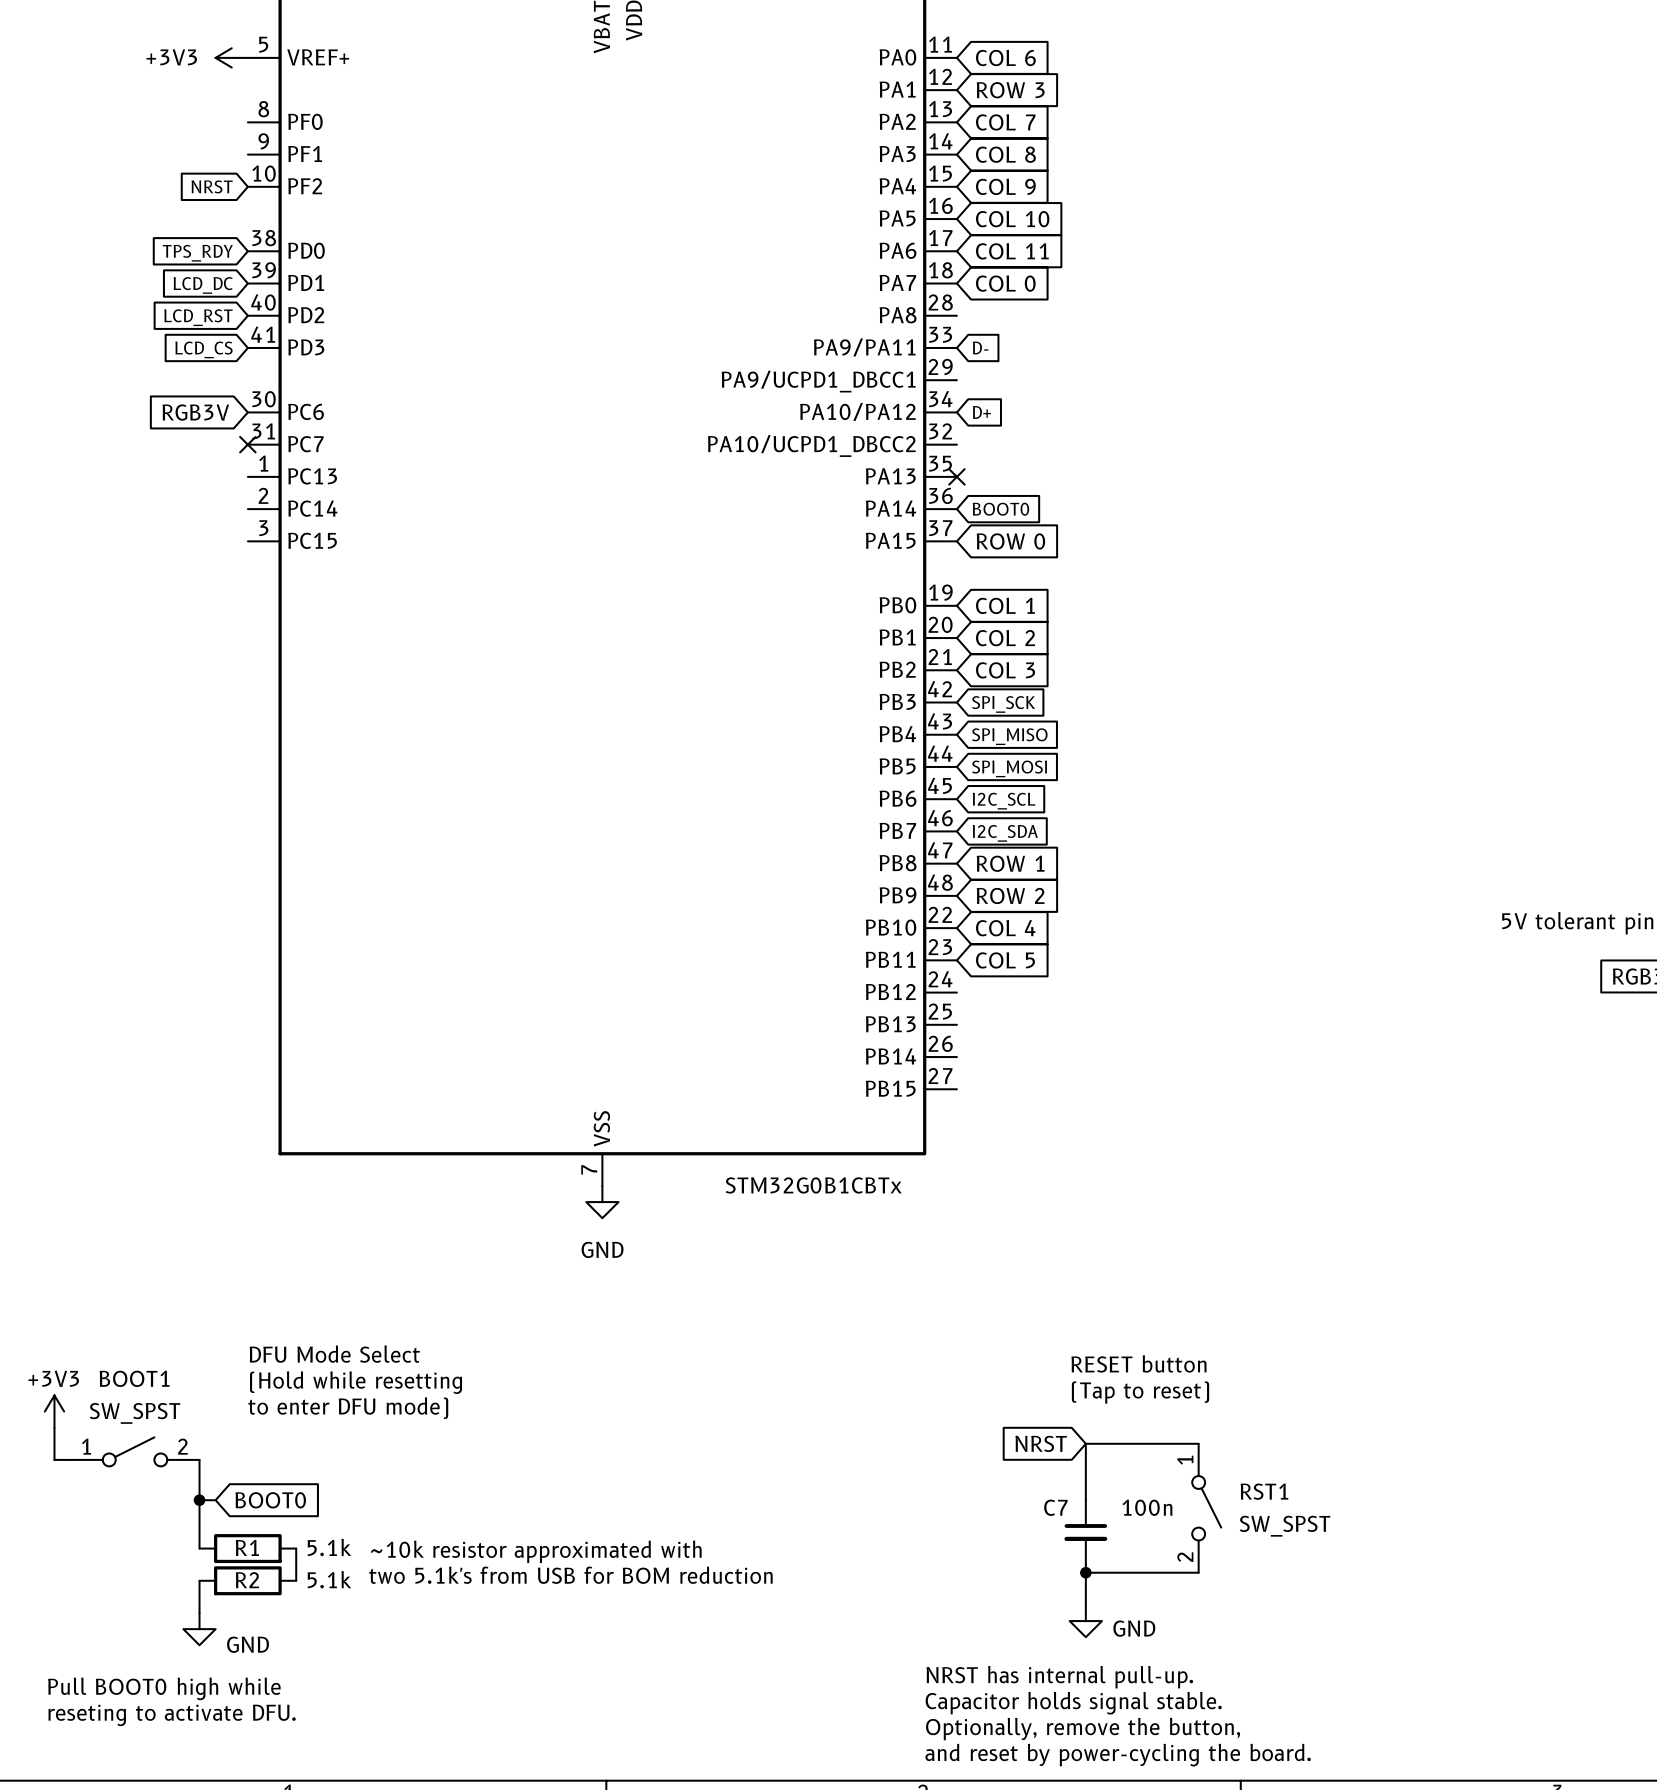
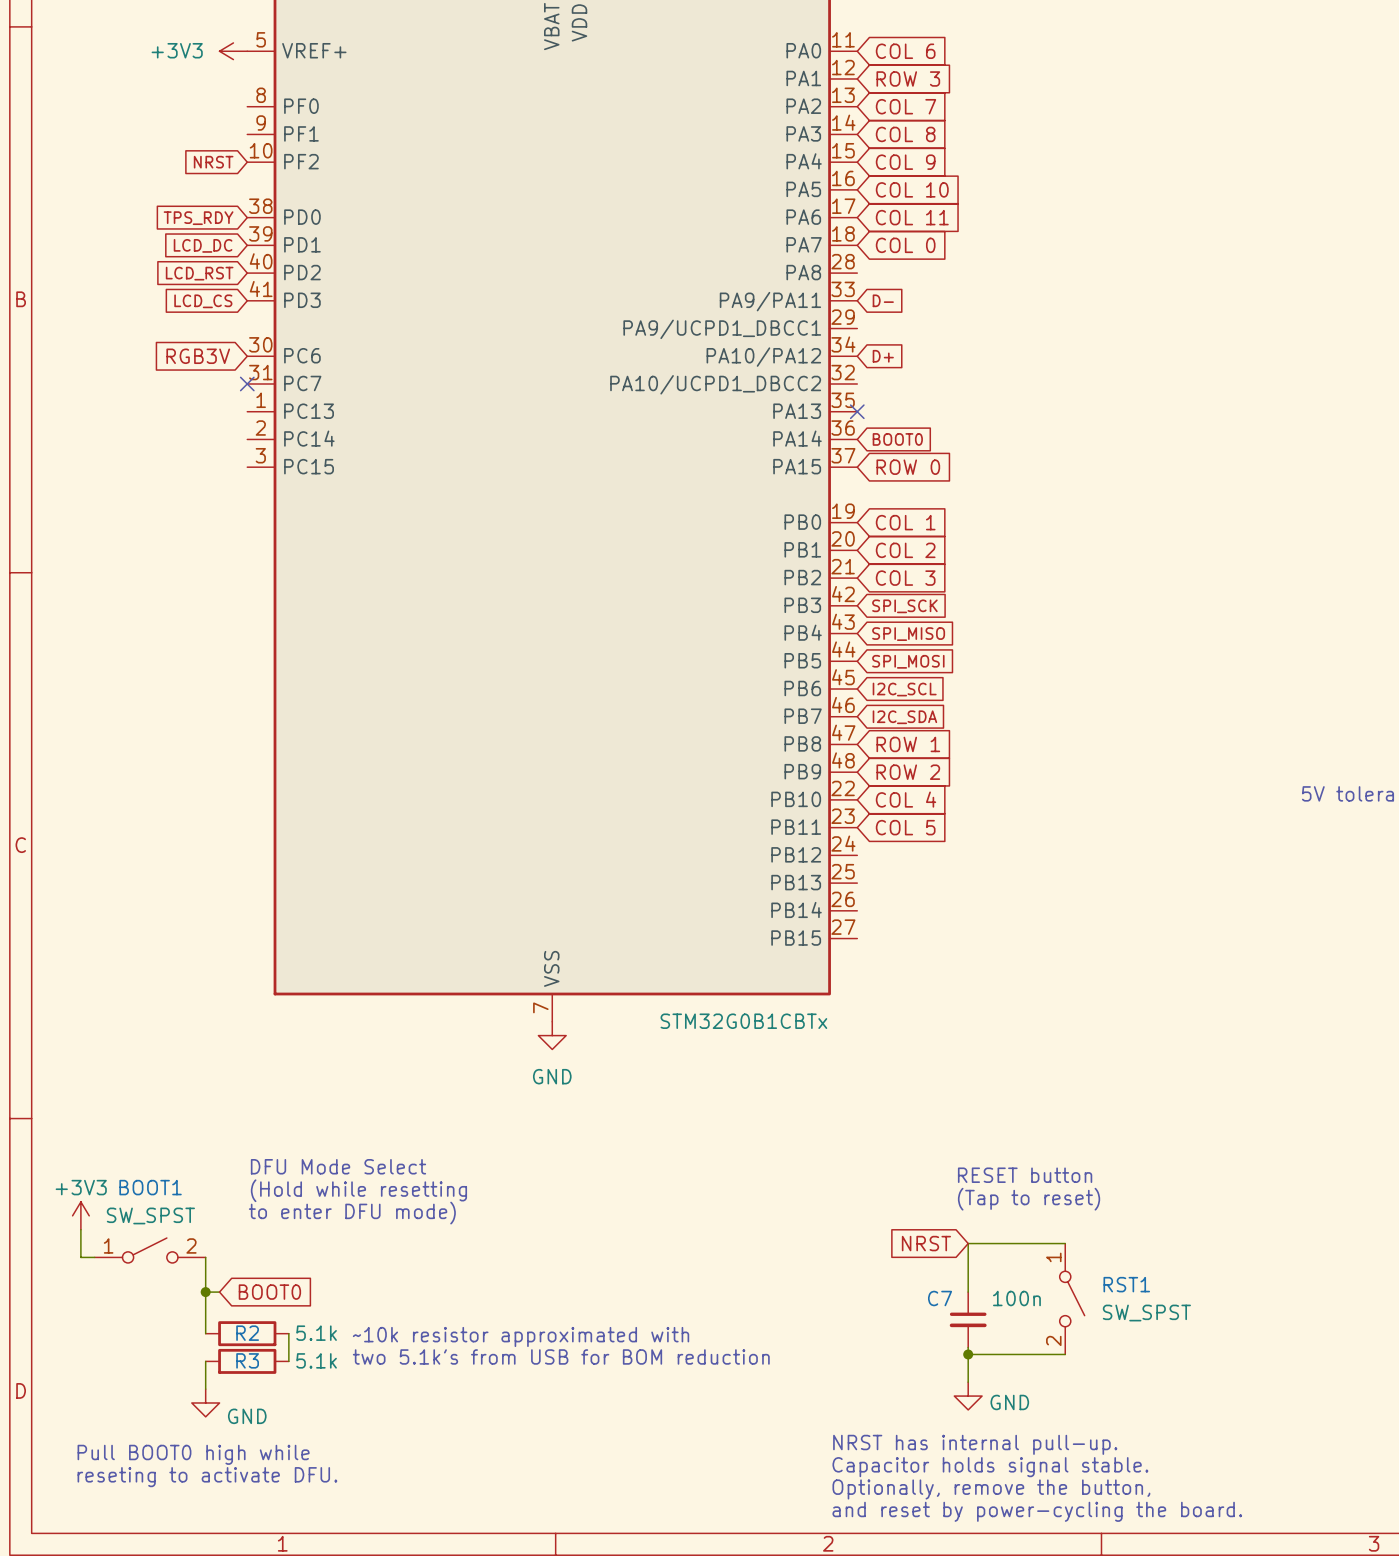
R1 name: R1 (247, 1547) -> R2 (247, 1333)
R2 name: R2 (247, 1580) -> R3 (247, 1360)

